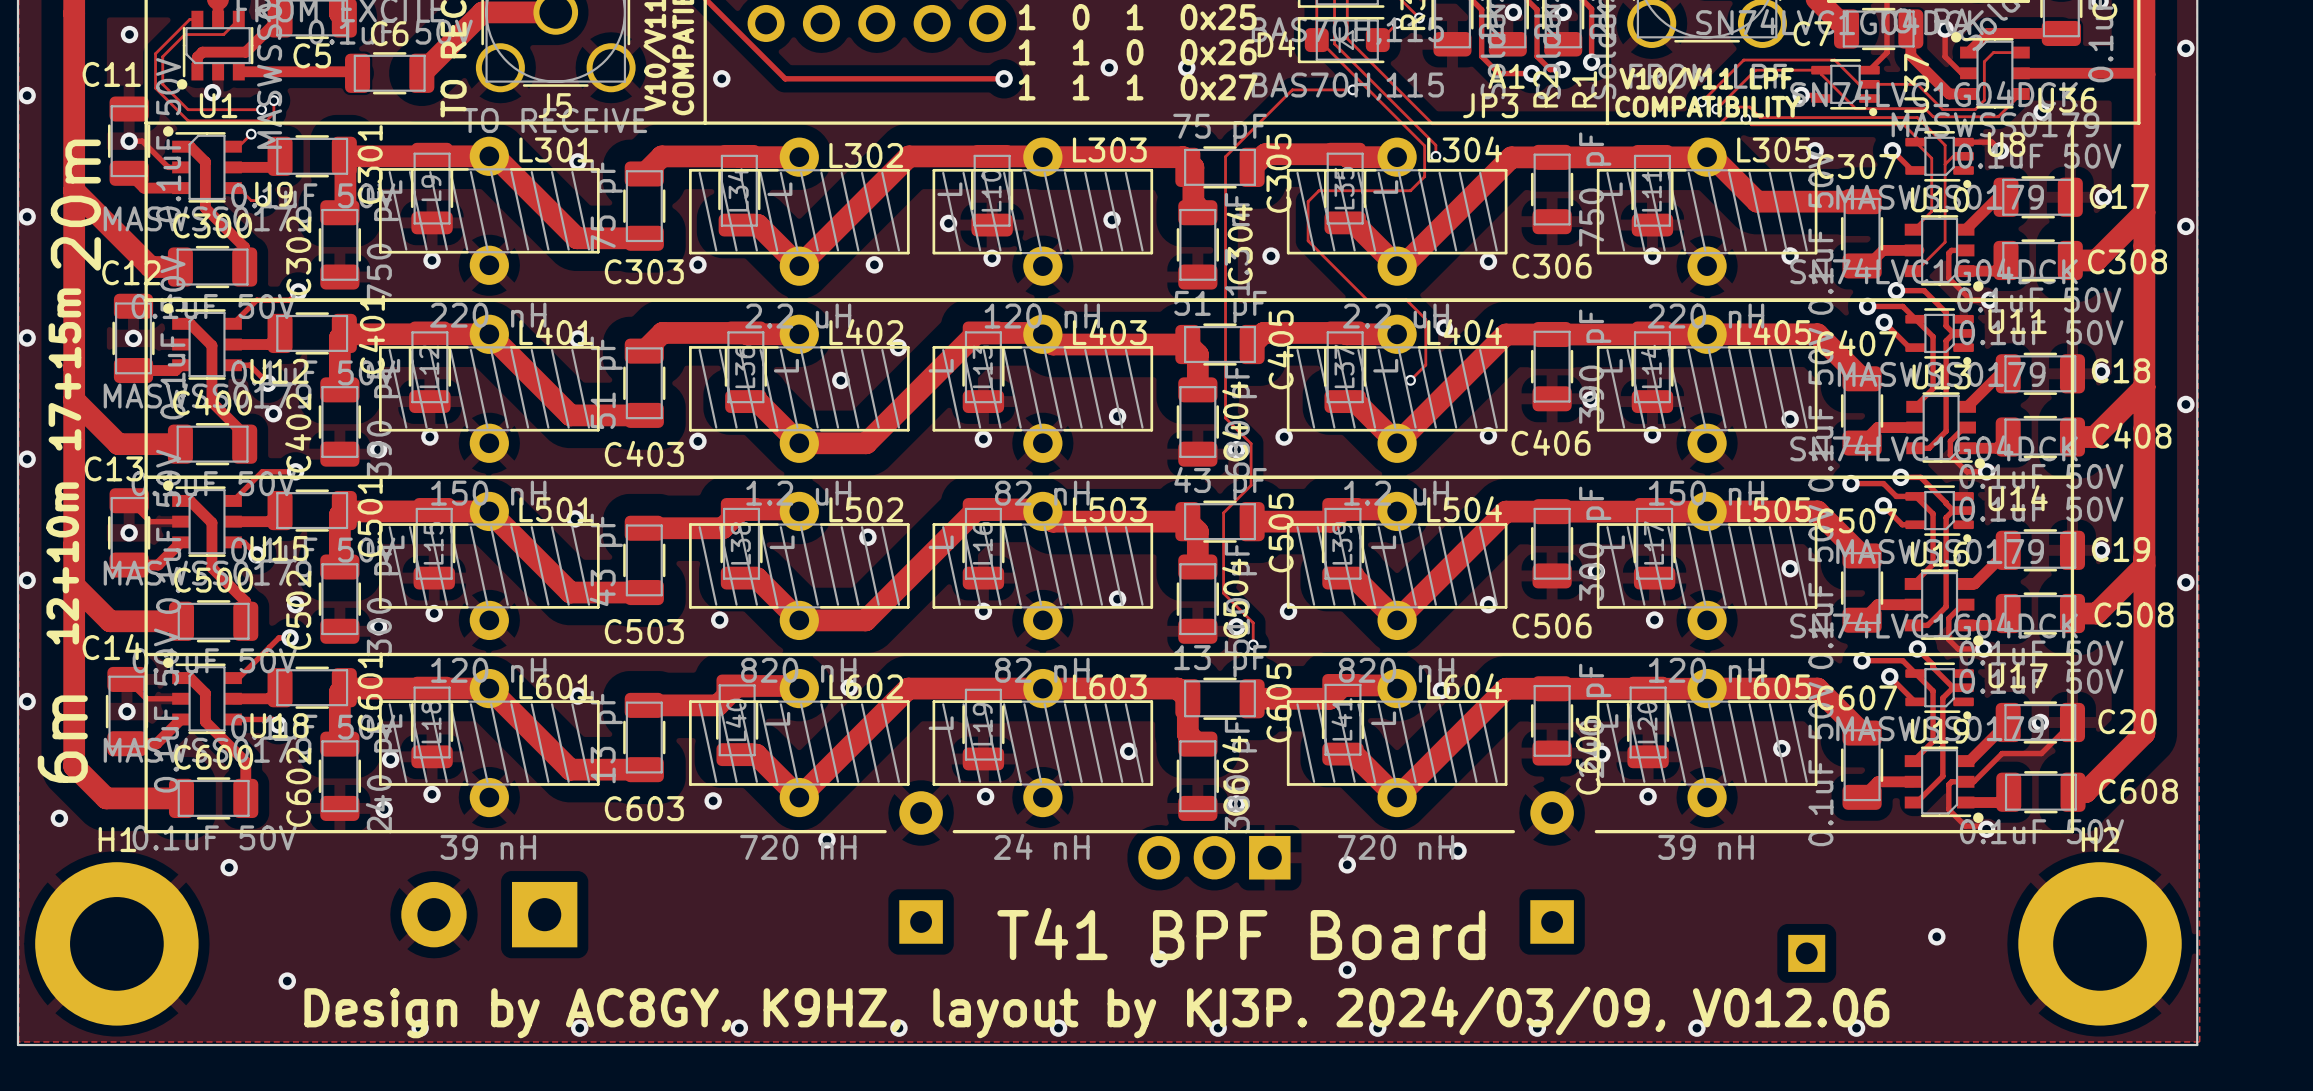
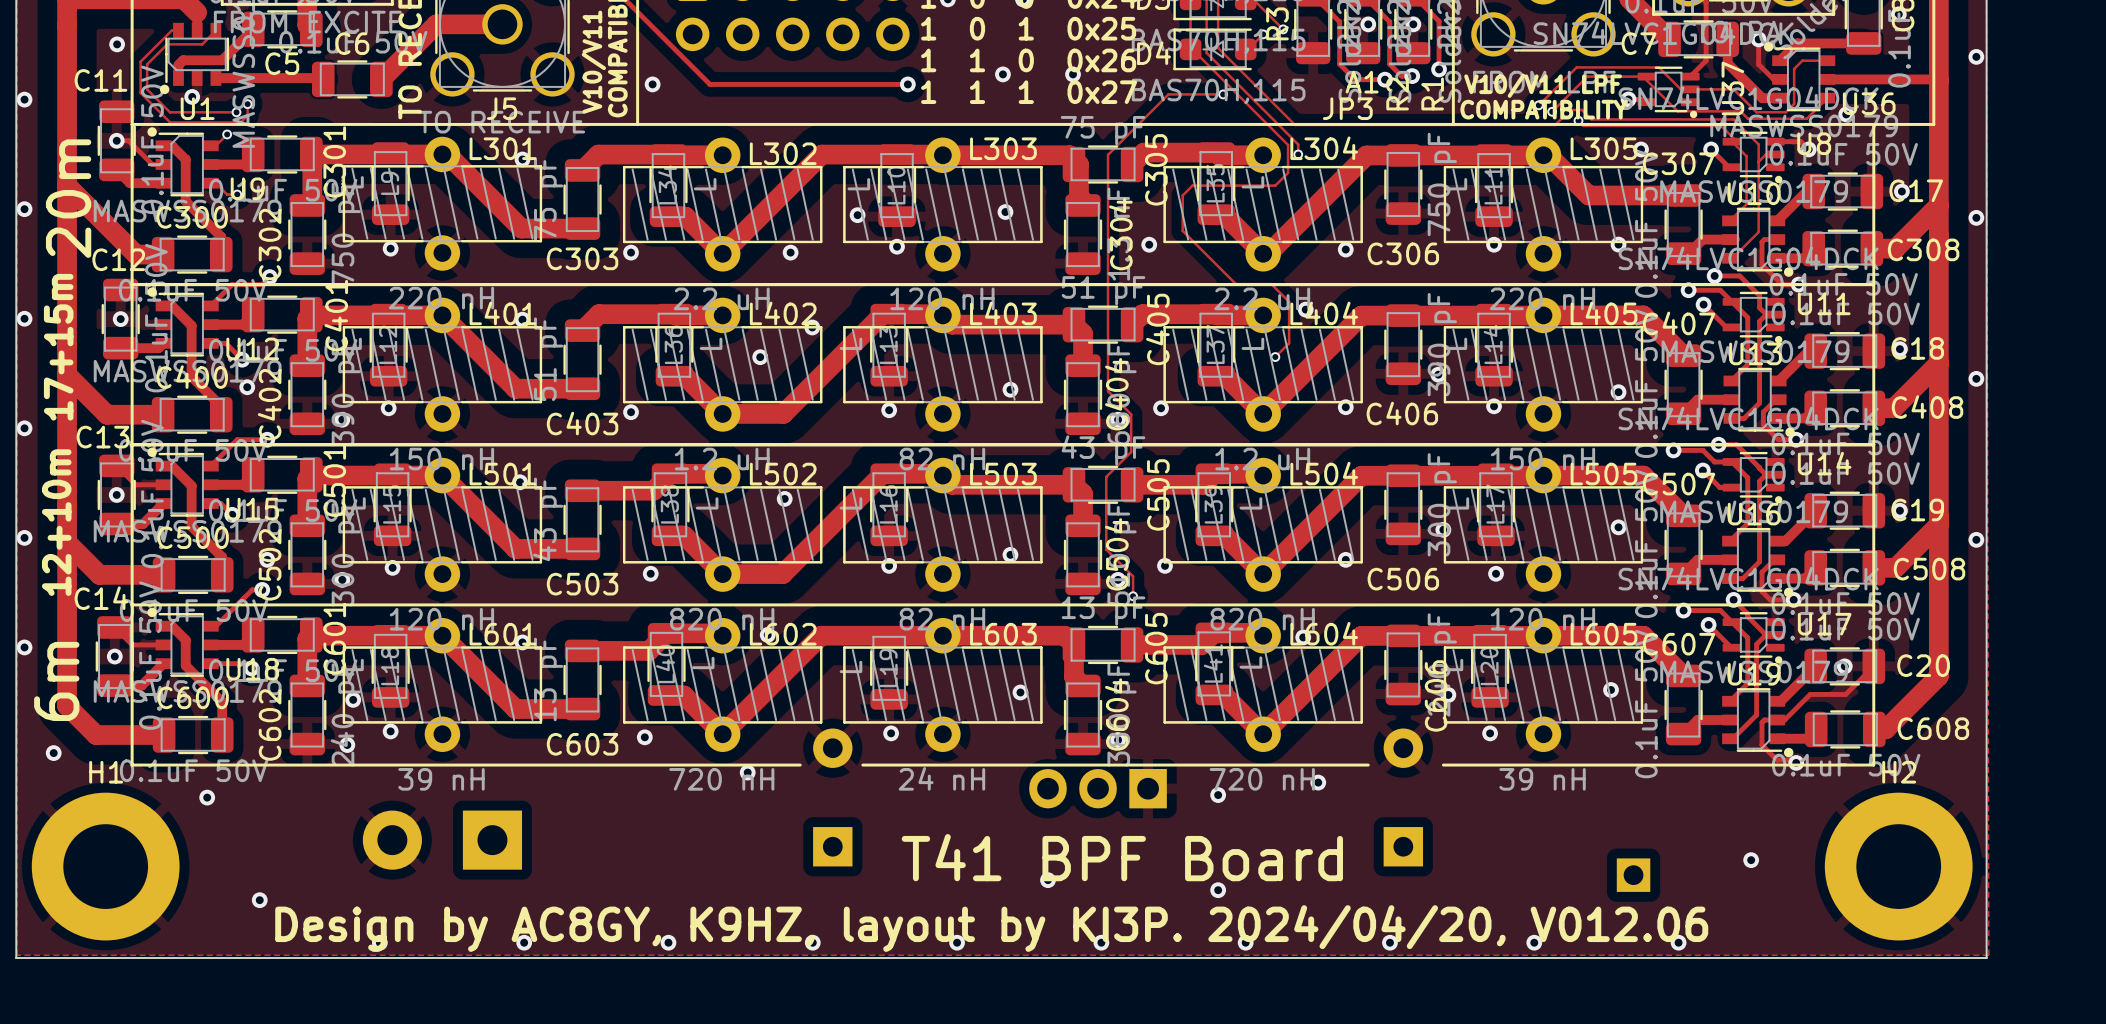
text: Design by AC8GY, K9HZ, layout by KI3P. 2024/03/09, V012.06 (1096, 1012) -> Design by AC8GY, K9HZ, layout by KI3P. 2024/04/20, V012.06 (991, 928)

